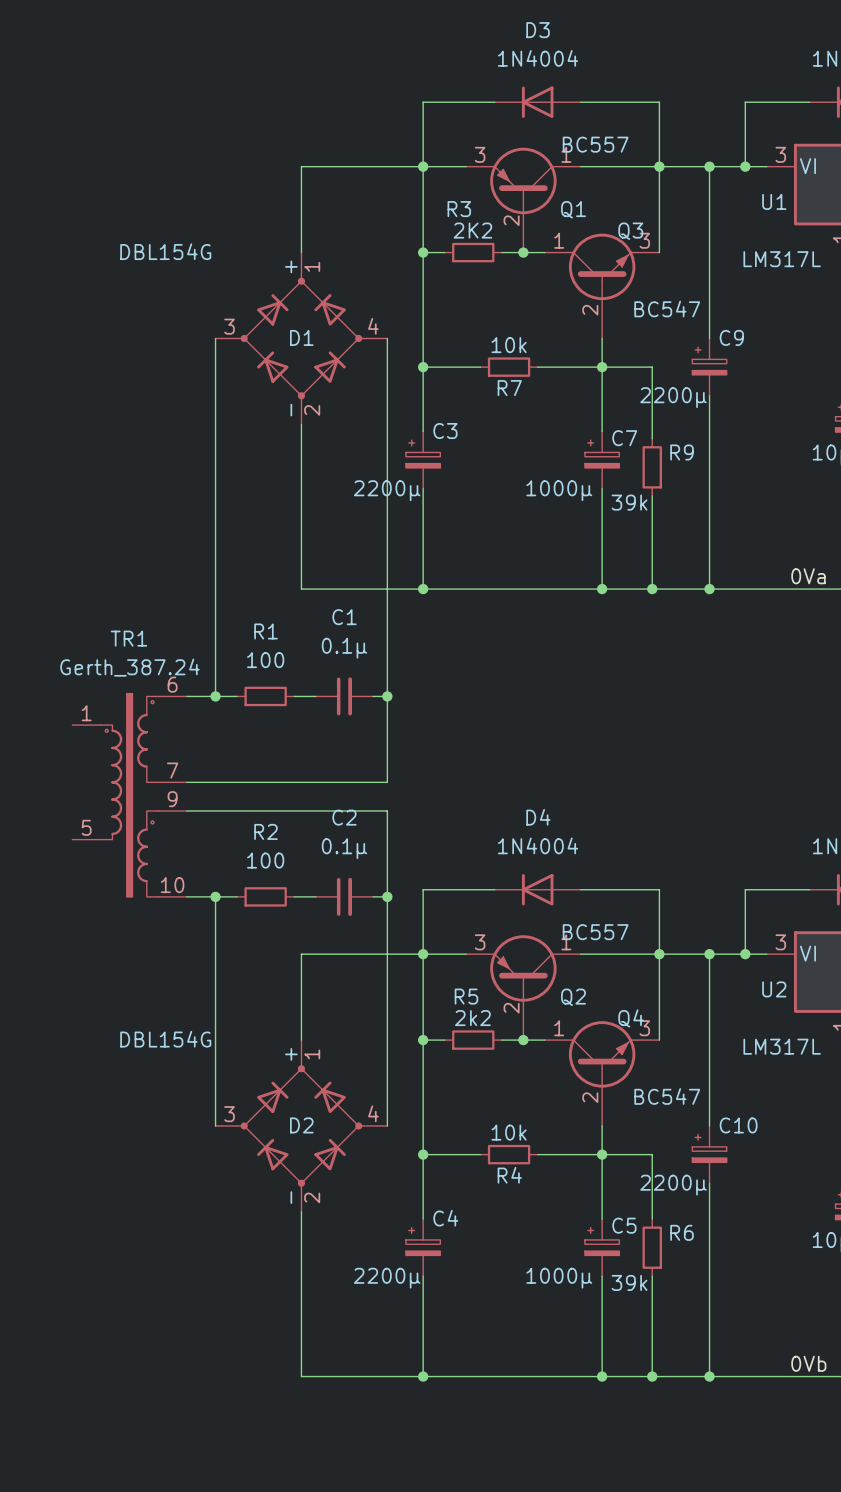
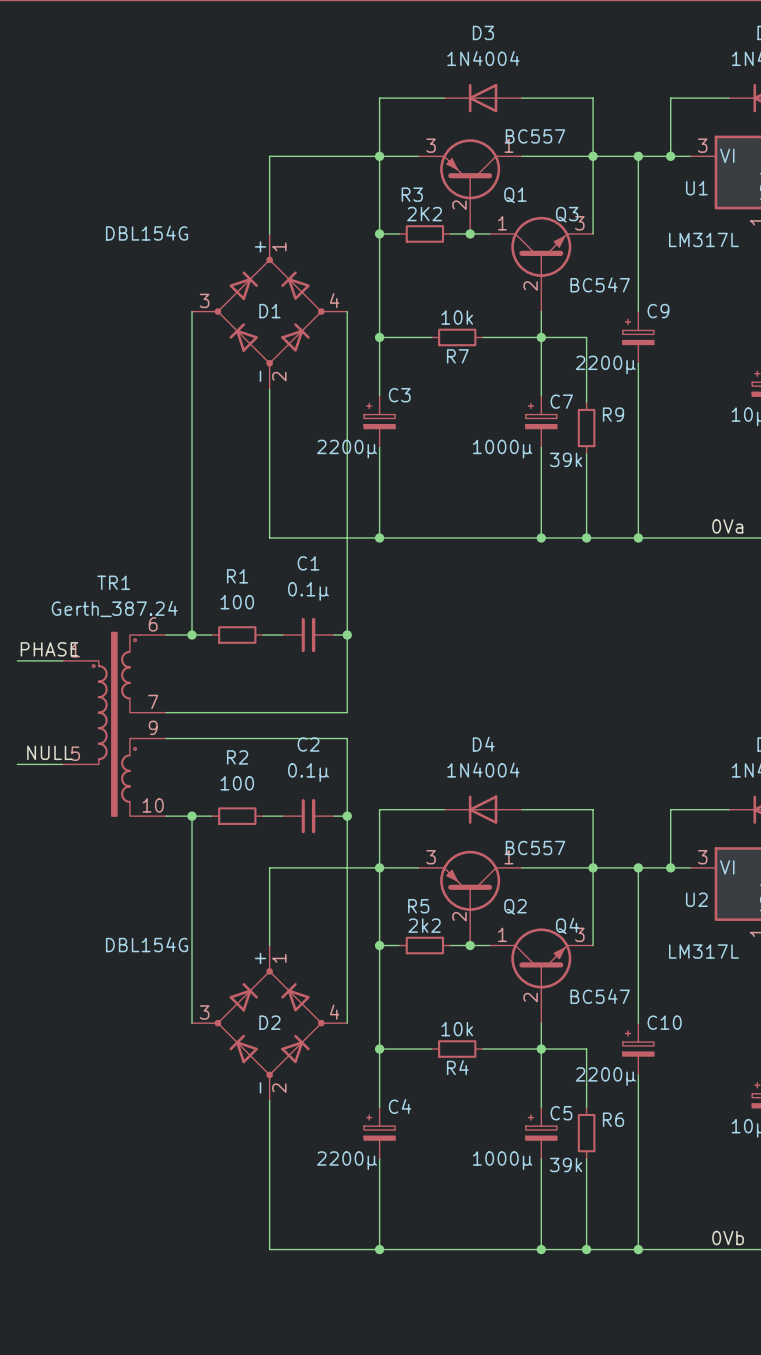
label: none -> PHASE (49, 649)
wire: none -> (17, 660) (62, 660)
label: none -> NULL (49, 752)
wire: none -> (17, 764) (62, 764)

